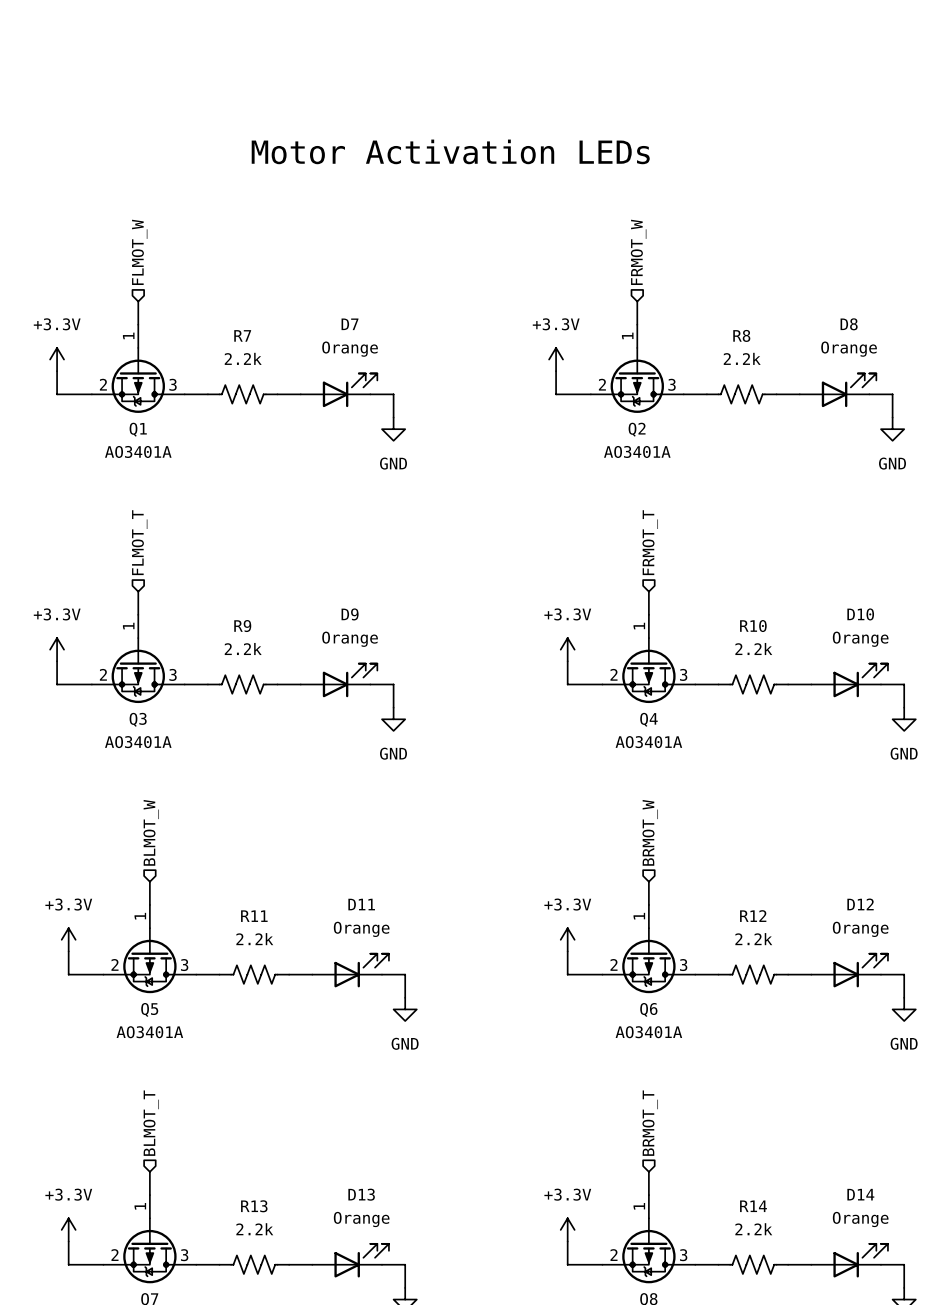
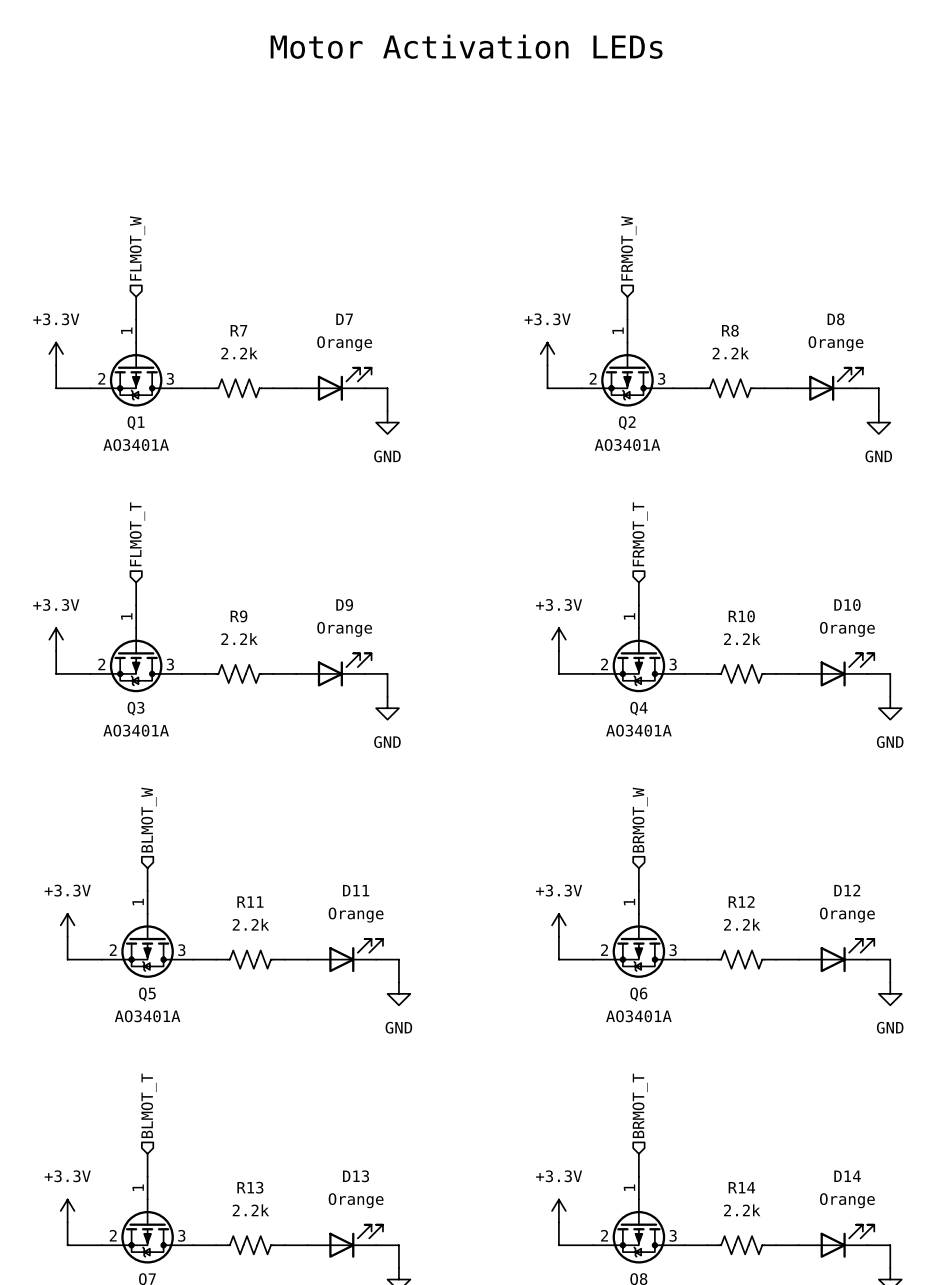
text position: Motor Activation LEDs (450, 151) -> Motor Activation LEDs (466, 46)

